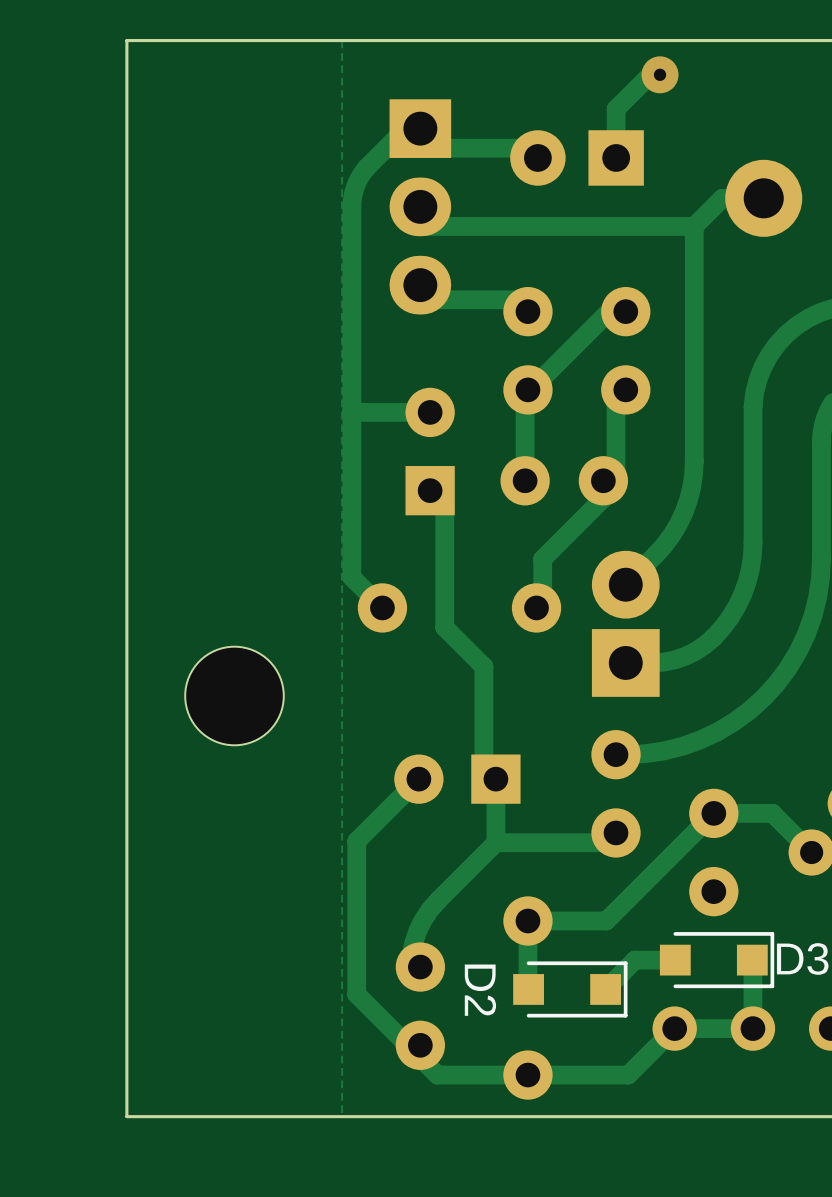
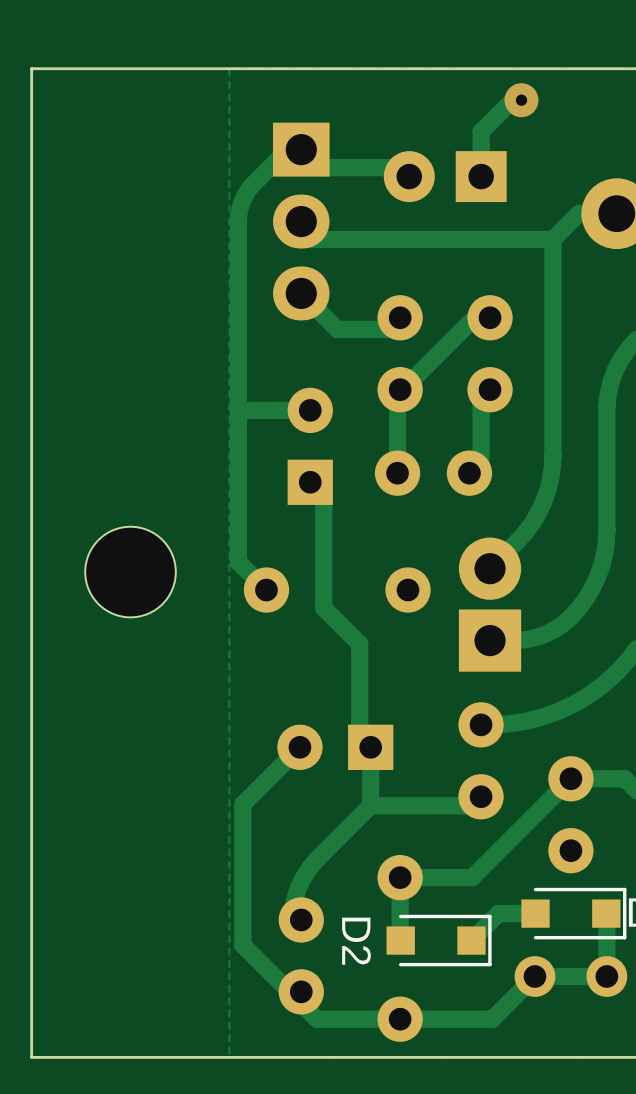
track: none -> (301, 293) (337, 329) (400, 329) (400, 317)
track: (527, 299) (420, 299) -> none
track: (603, 480) (603, 498) (542, 559) (542, 607) -> none
part position: (234, 695) -> (130, 572)

